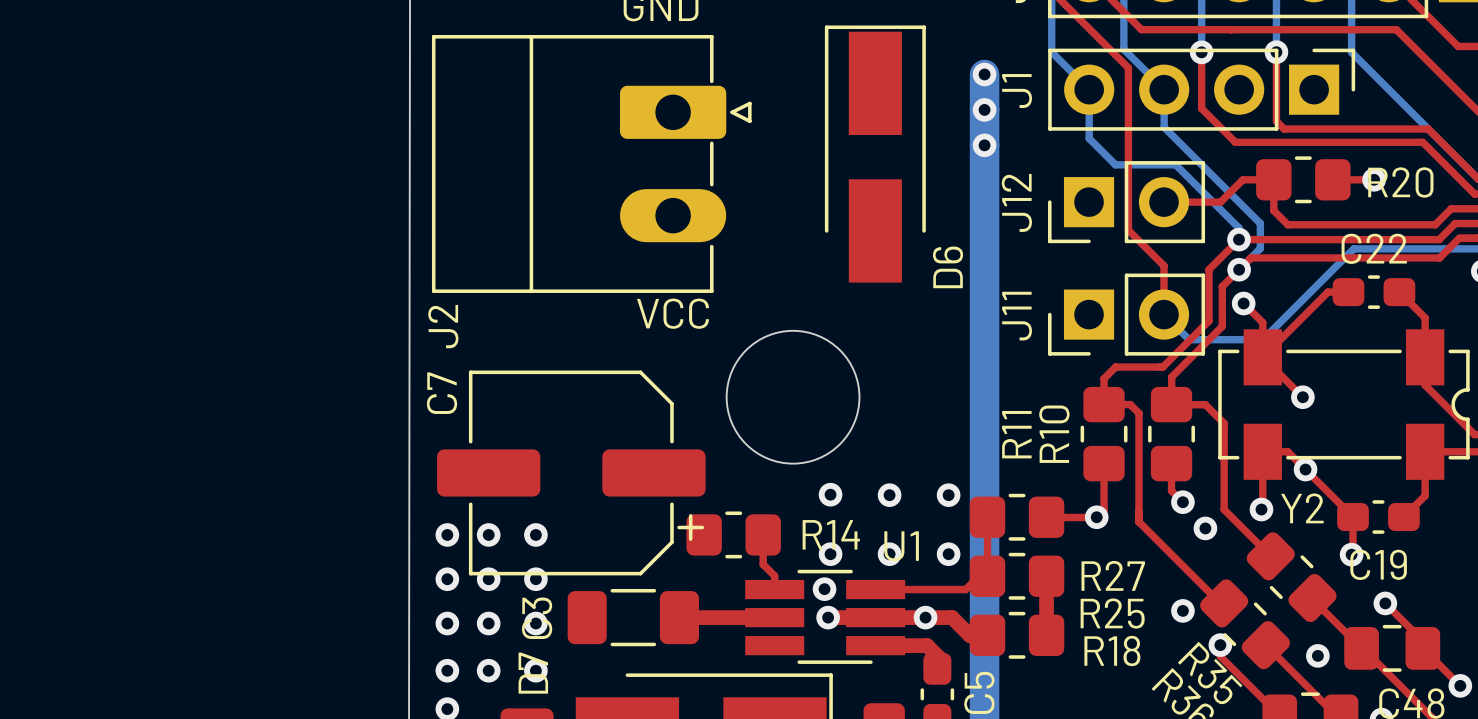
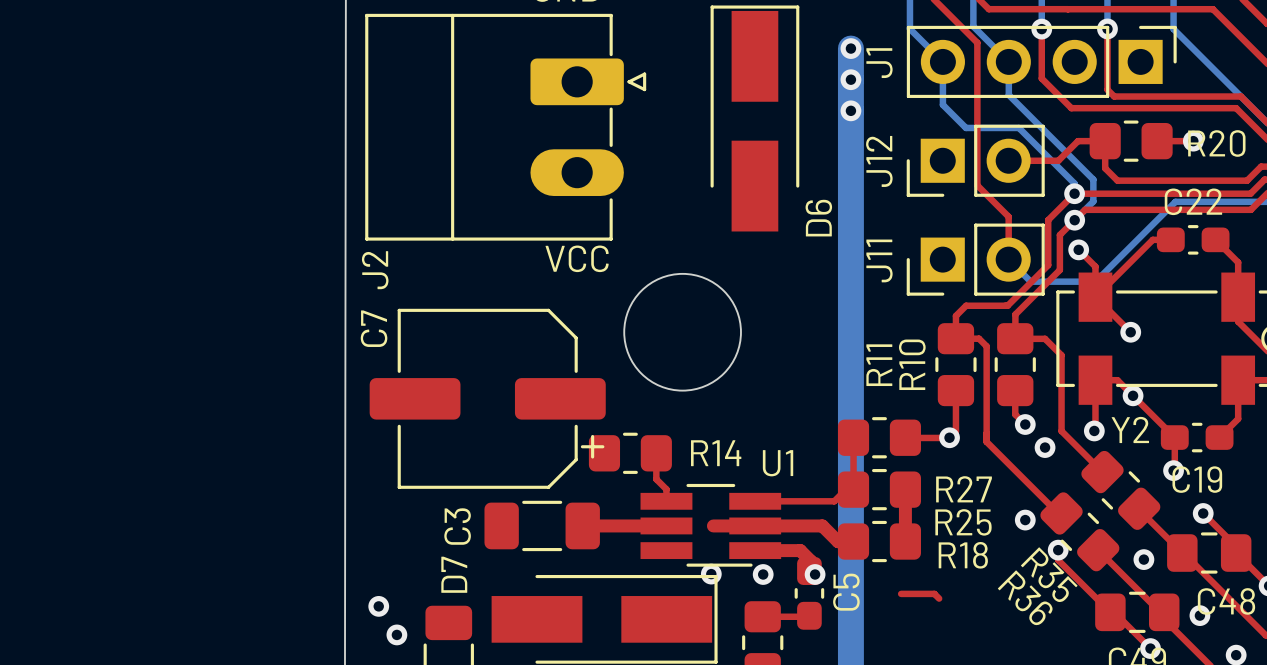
via: (830, 494) -> none
via: (889, 495) -> none
via: (948, 495) -> none
via: (447, 534) -> none
via: (488, 534) -> none
via: (535, 534) -> none
via: (830, 554) -> none
via: (889, 554) -> none
via: (948, 554) -> none
via: (447, 579) -> none
via: (488, 579) -> none
via: (535, 579) -> none
via: (824, 589) -> none
via: (828, 617) -> none
via: (925, 617) -> none
via: (447, 623) -> none
via: (488, 623) -> none
via: (535, 623) -> none
via: (447, 670) -> none
via: (488, 670) -> none
via: (535, 670) -> none
via: none -> (711, 574)
via: none -> (763, 574)
via: none -> (815, 574)
top track: none -> (901, 593) (934, 593) (939, 598)

